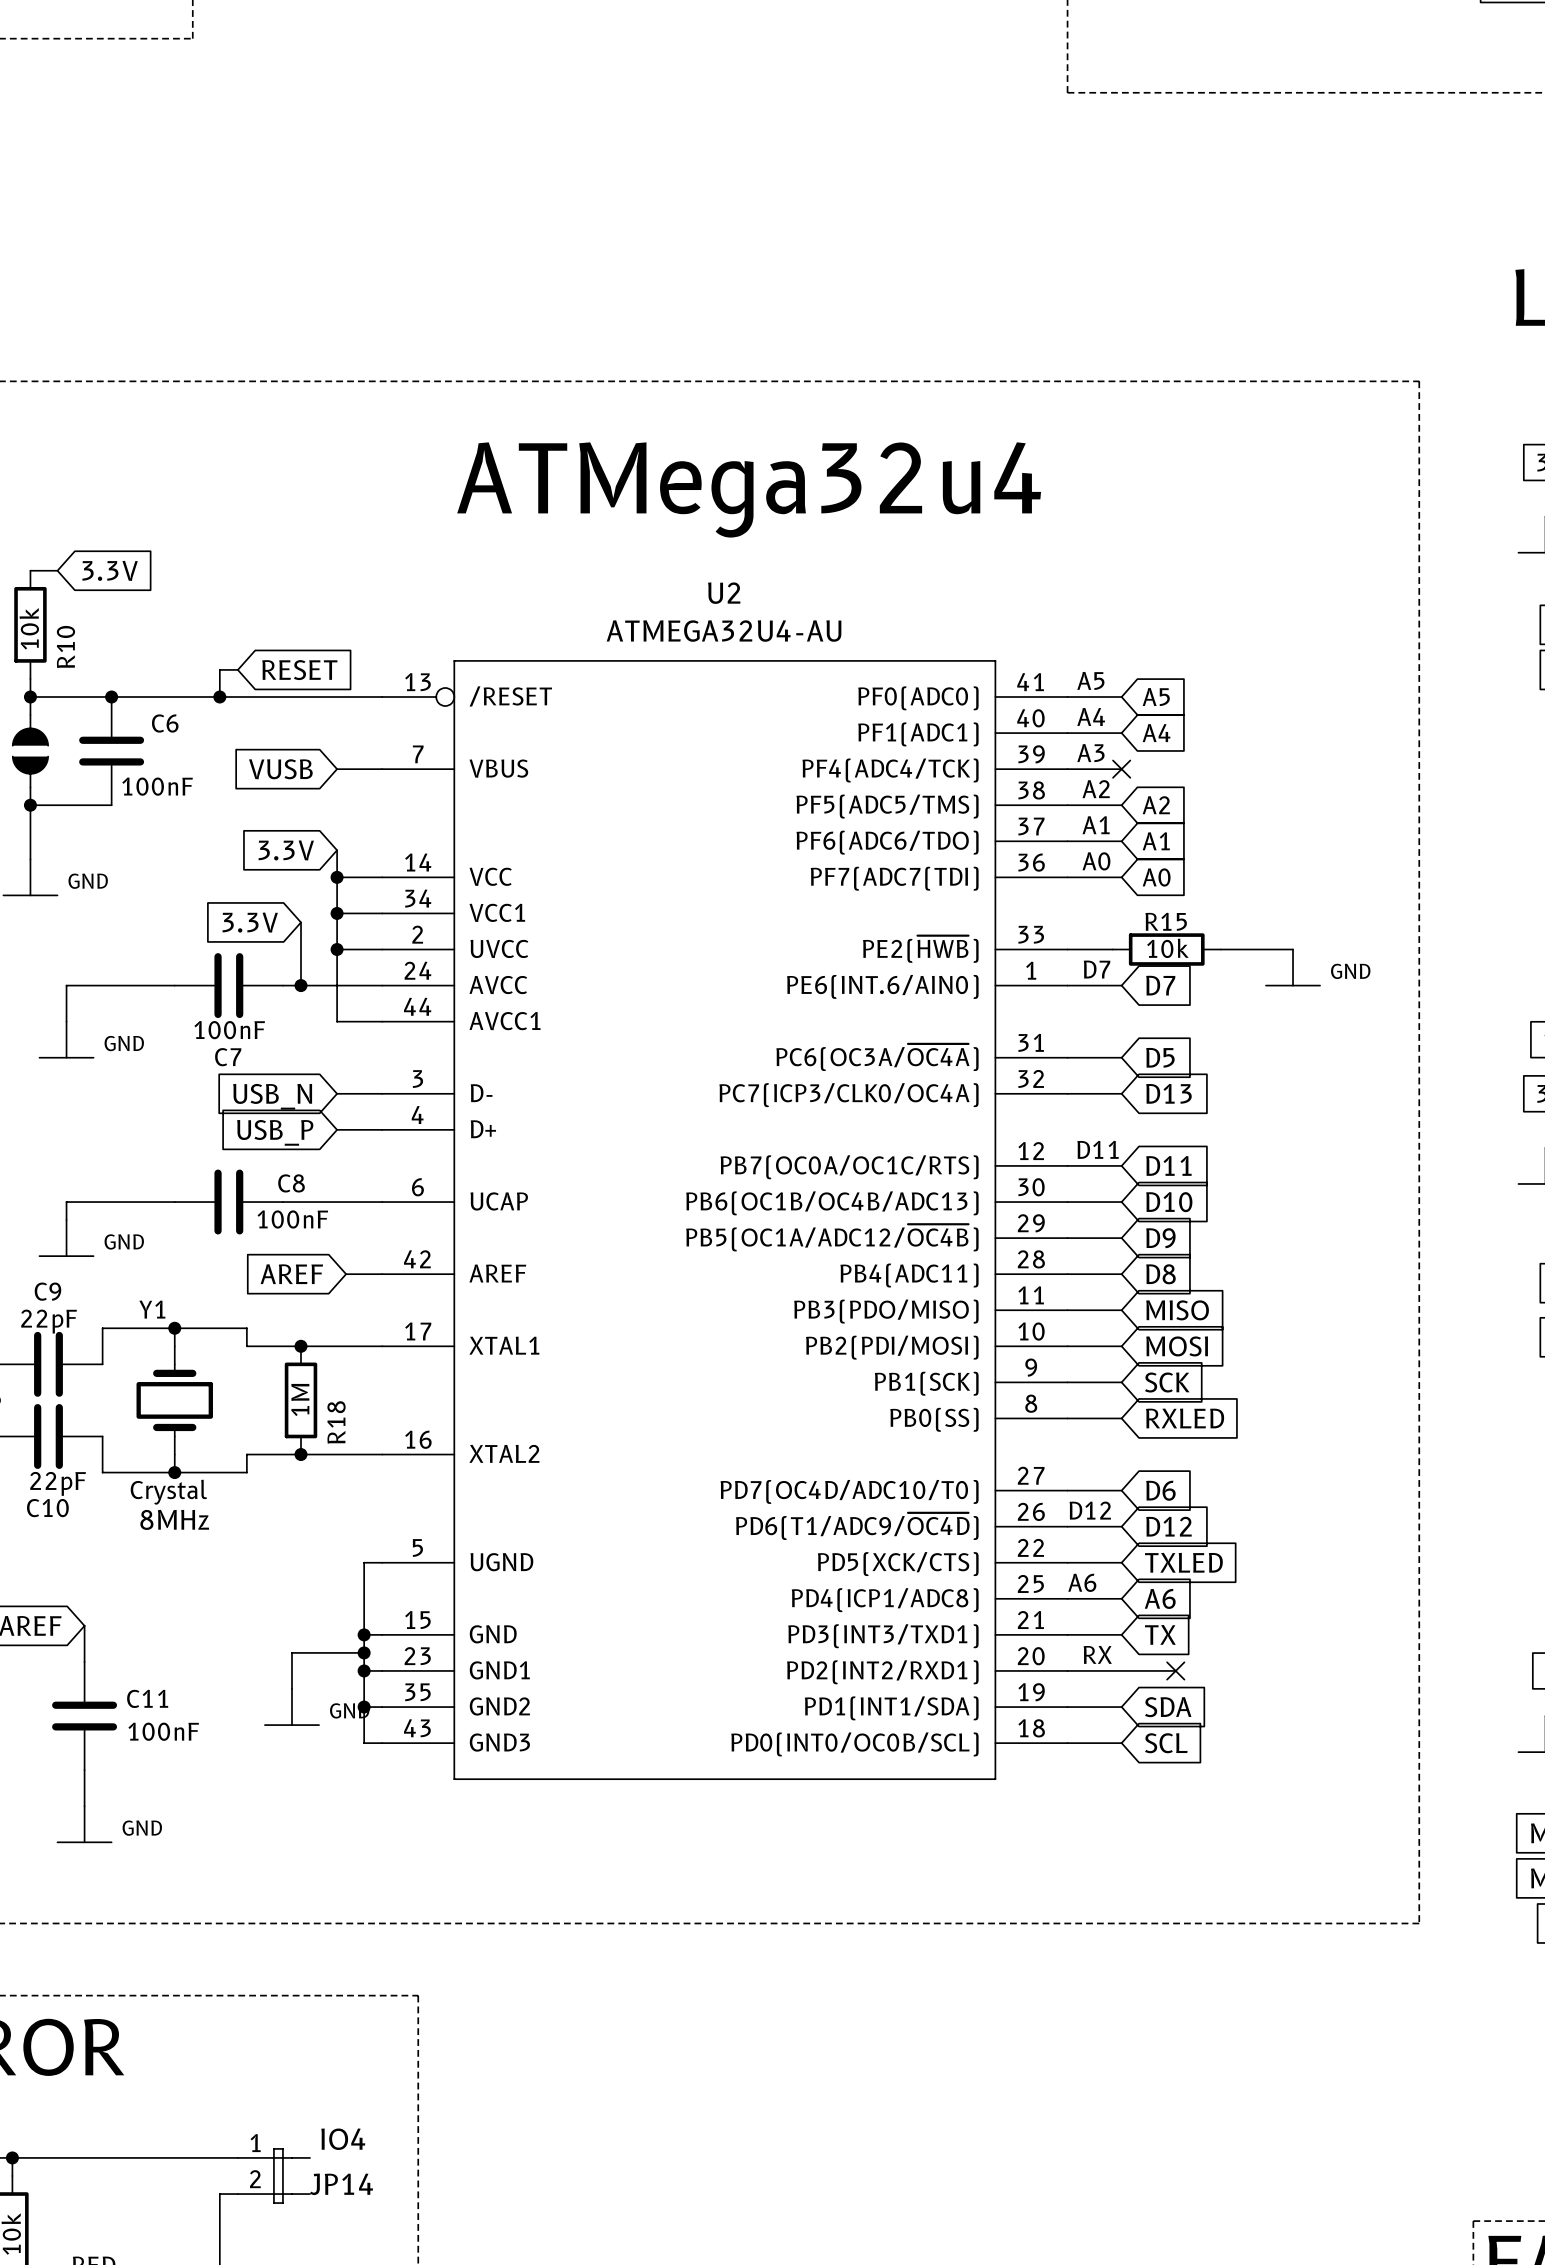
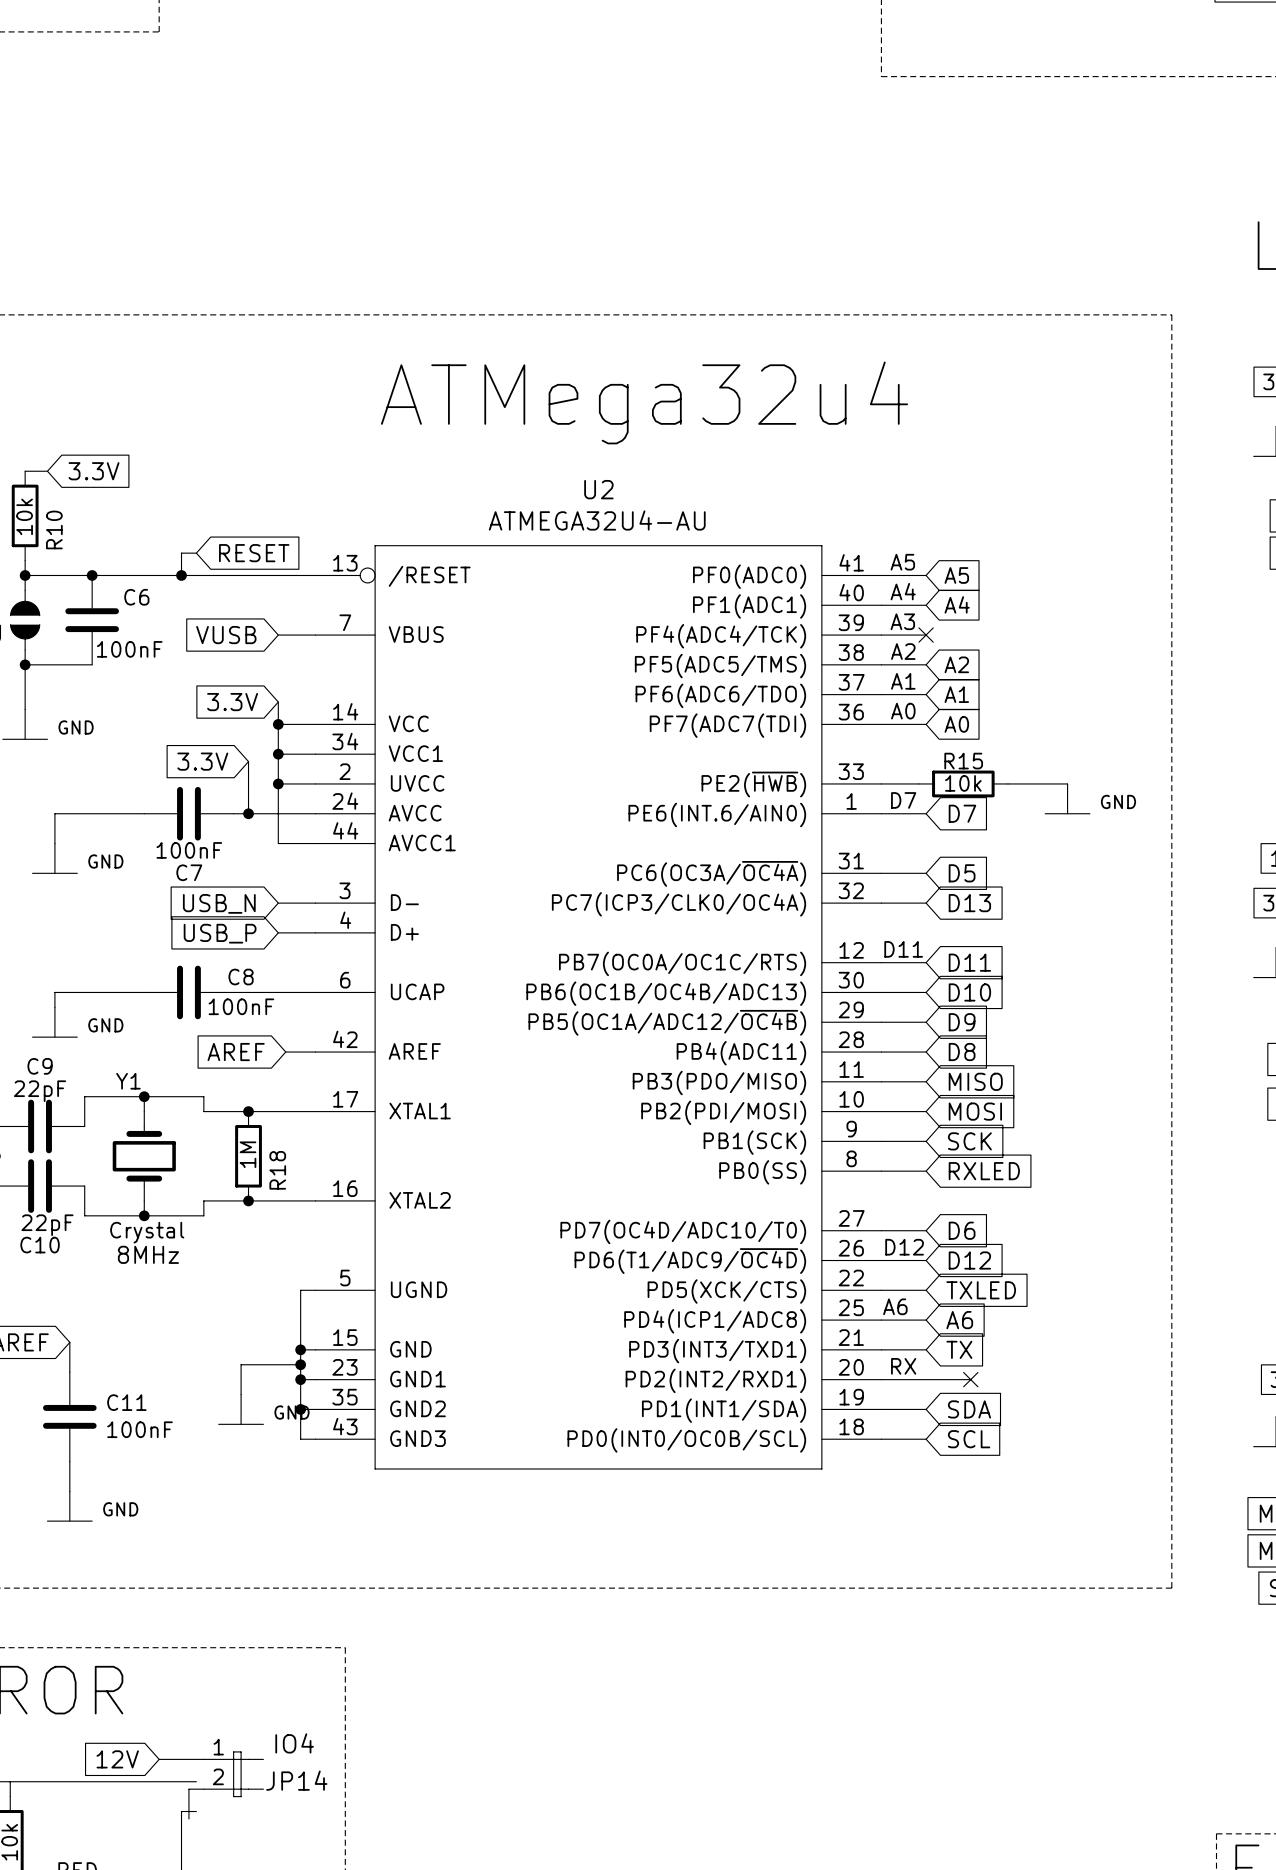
wire: none -> (159, 1759) (203, 1759)
global label: none -> 12V (117, 1759)
junction: (12, 2157) -> none
wire: none -> (203, 1789) (188, 1789) (188, 1818)
JP14 position: (273, 2175) -> (233, 1774)

